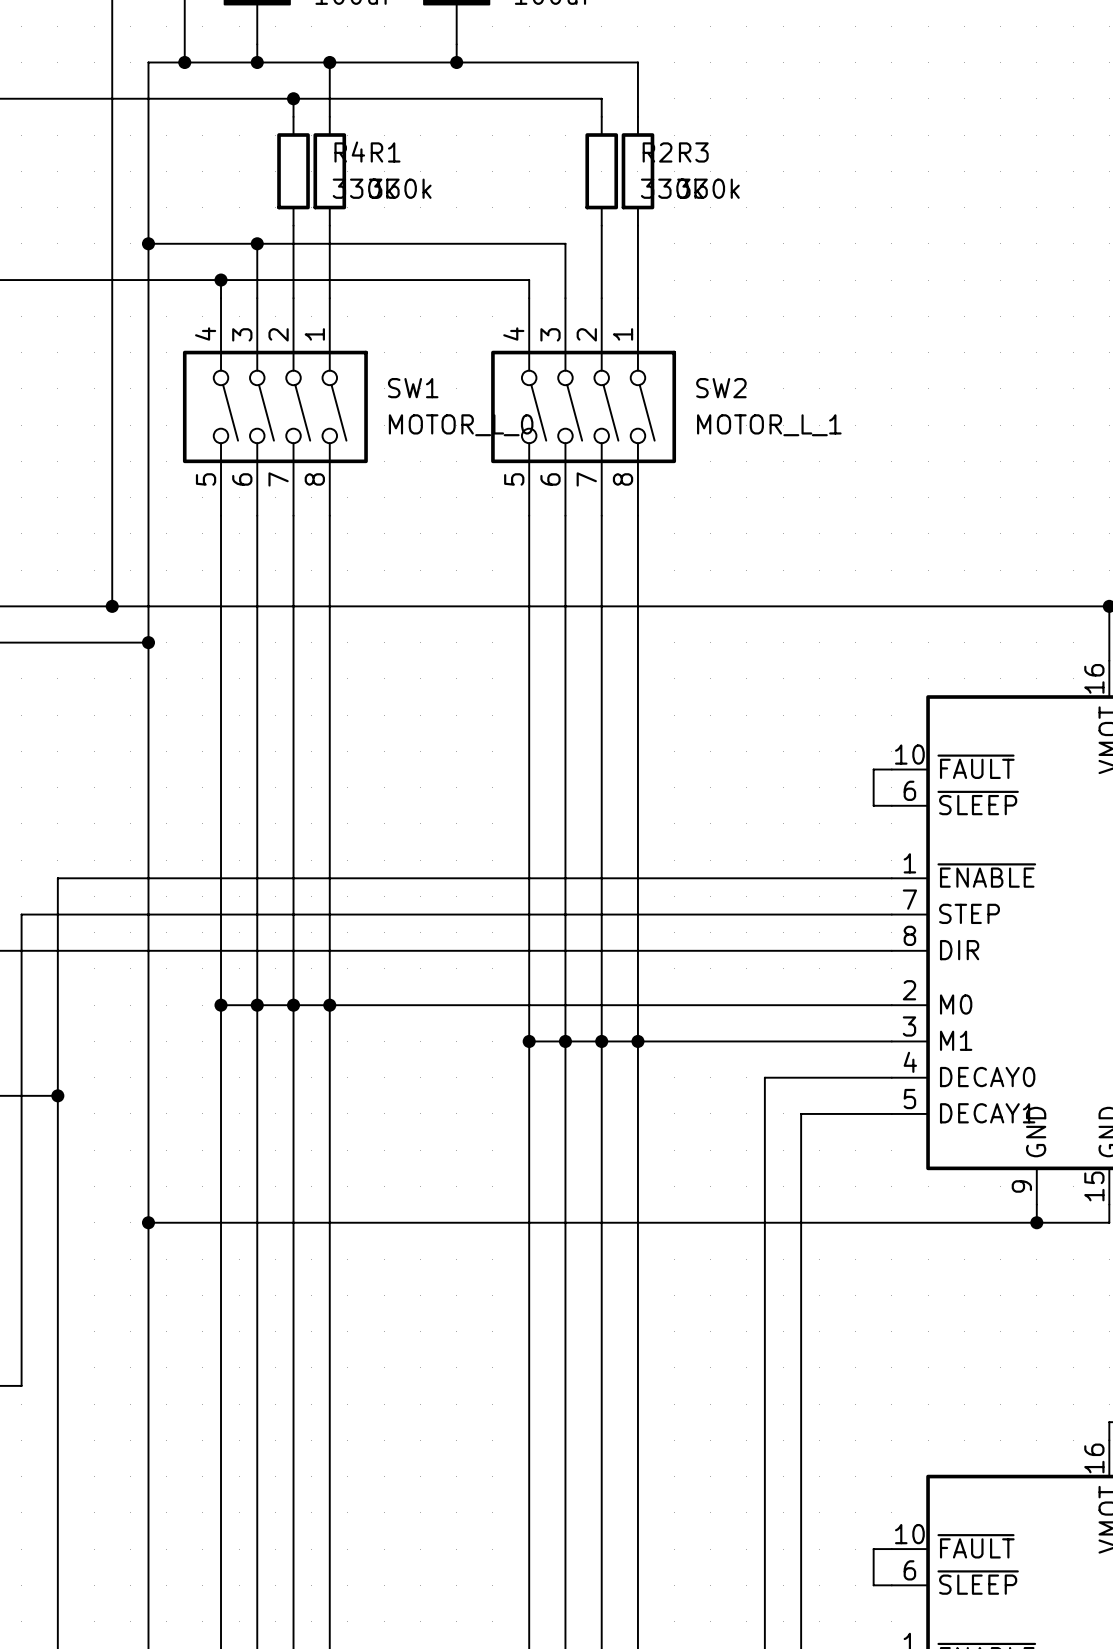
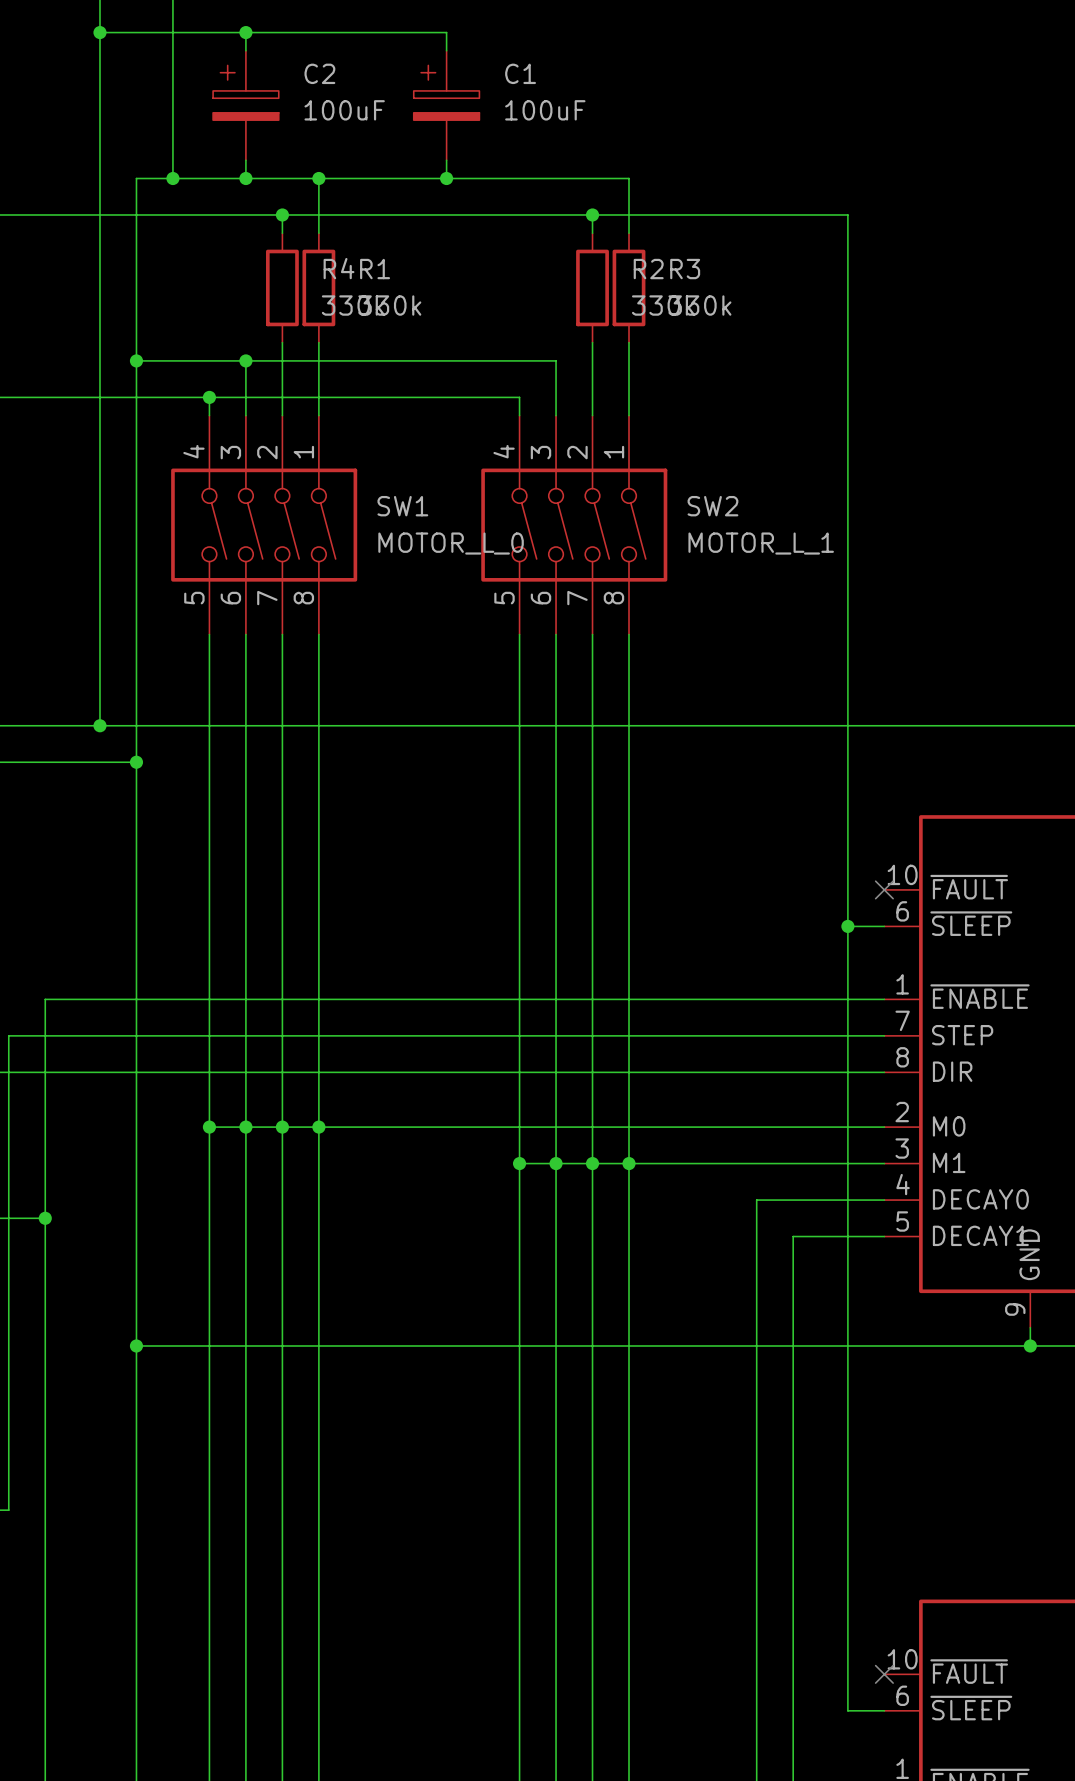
junction: none -> (592, 214)
wire: (891, 769) (873, 769) (873, 805) -> (847, 926) (866, 926)
no-connect mark: none -> (884, 889)
junction: none -> (847, 926)
wire: (891, 1549) (873, 1549) (873, 1585) -> (592, 214) (847, 214) (847, 1710) (866, 1710)
no-connect mark: none -> (884, 1674)

